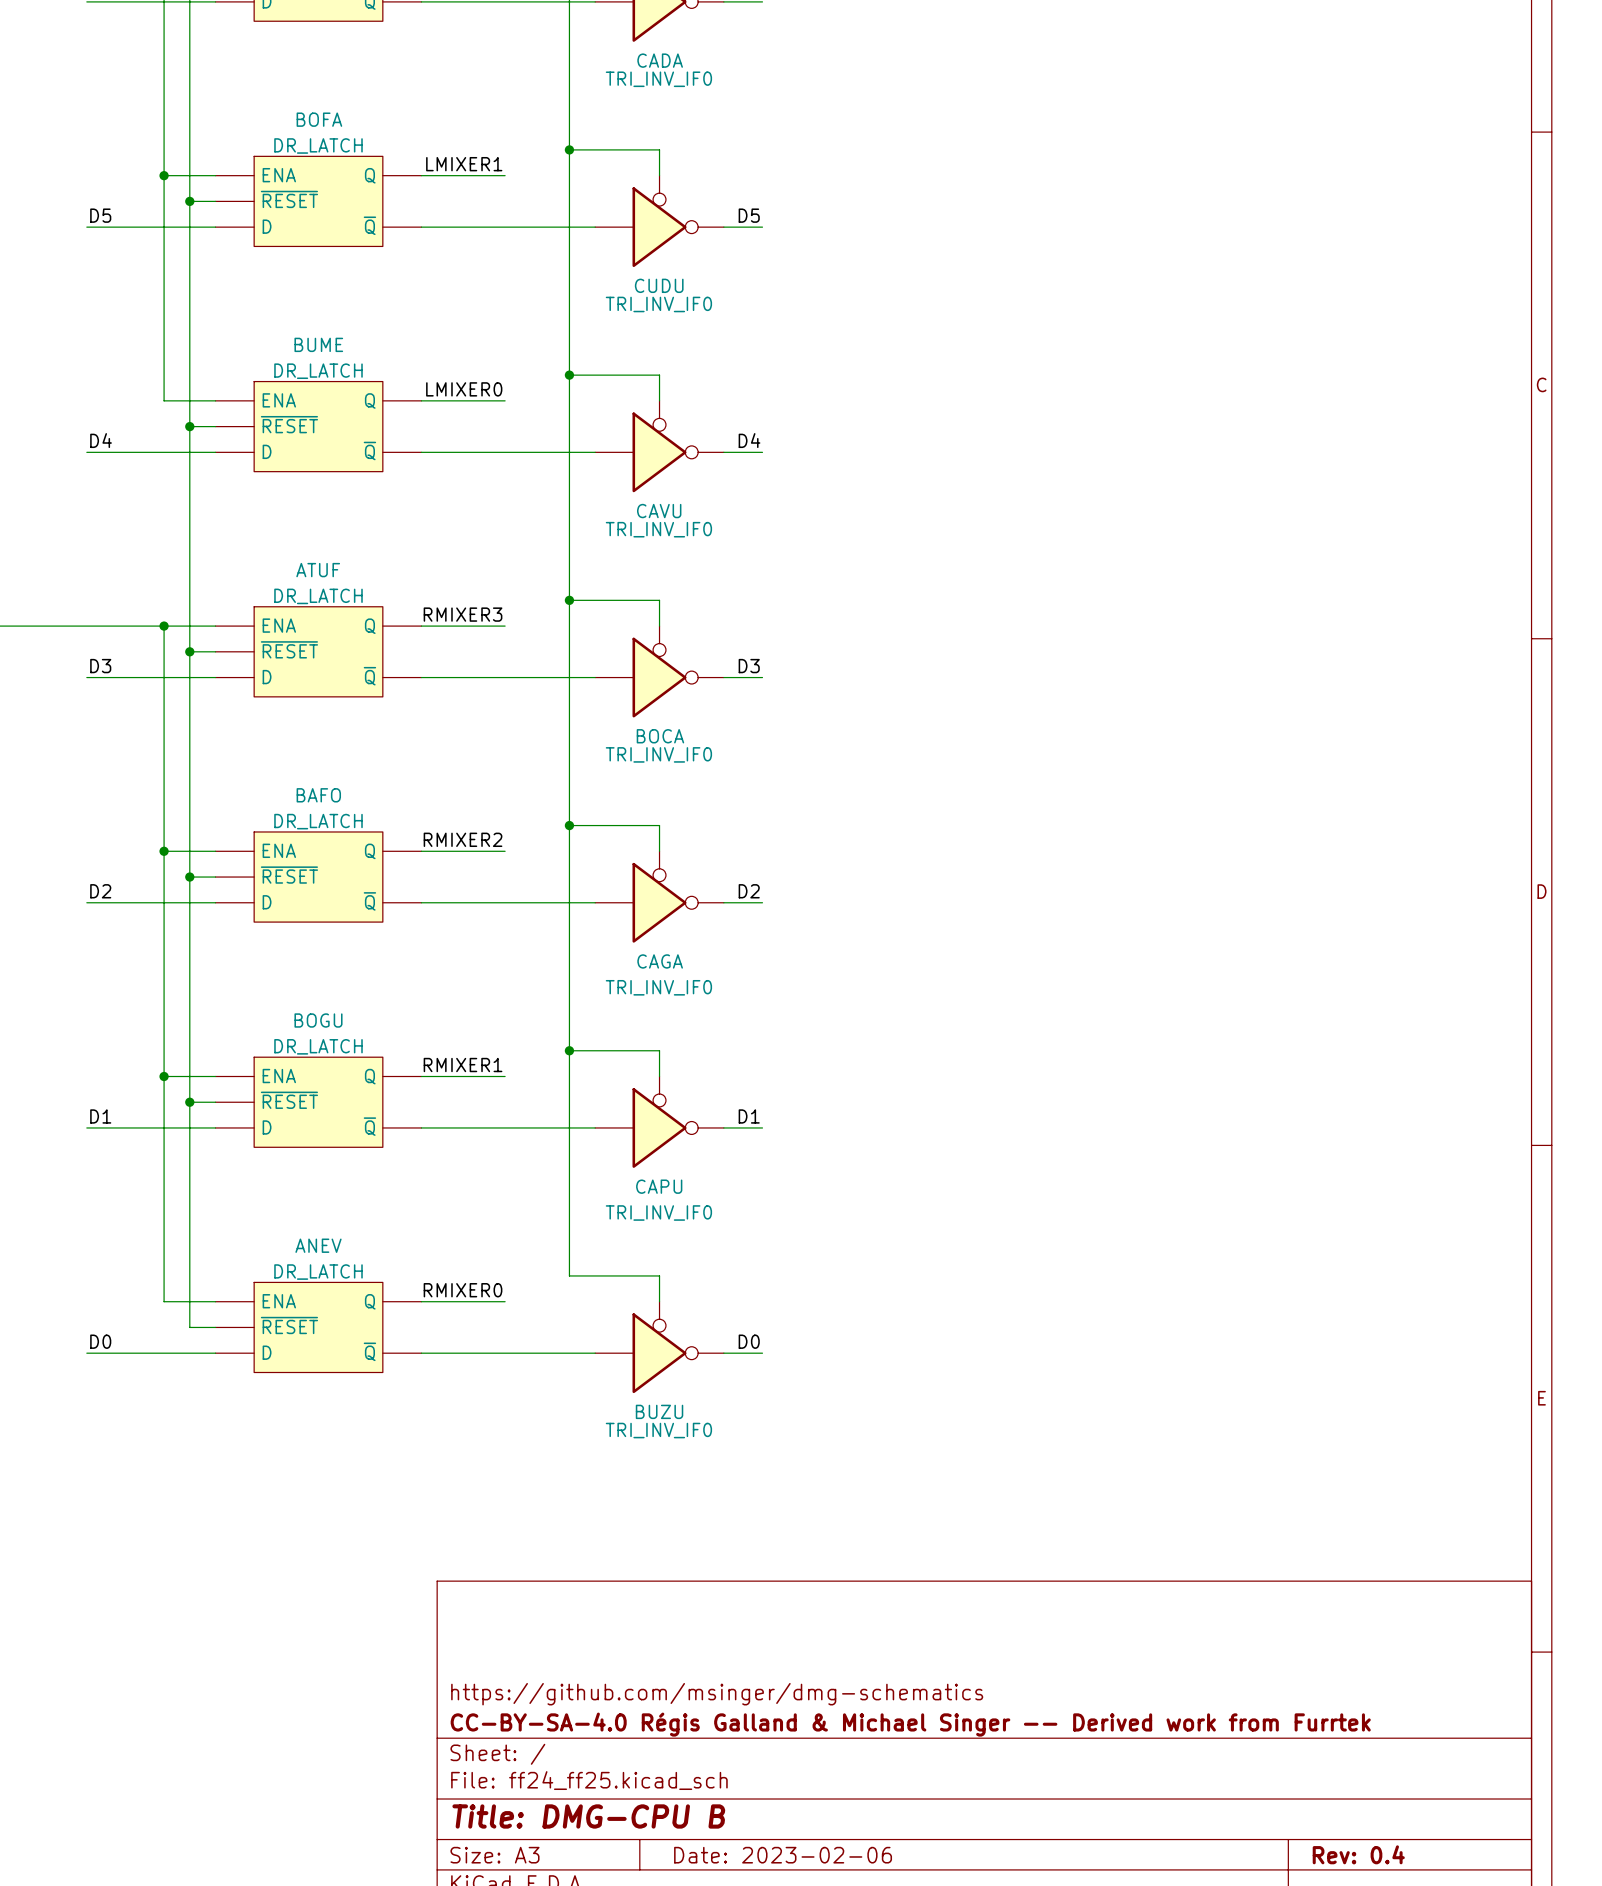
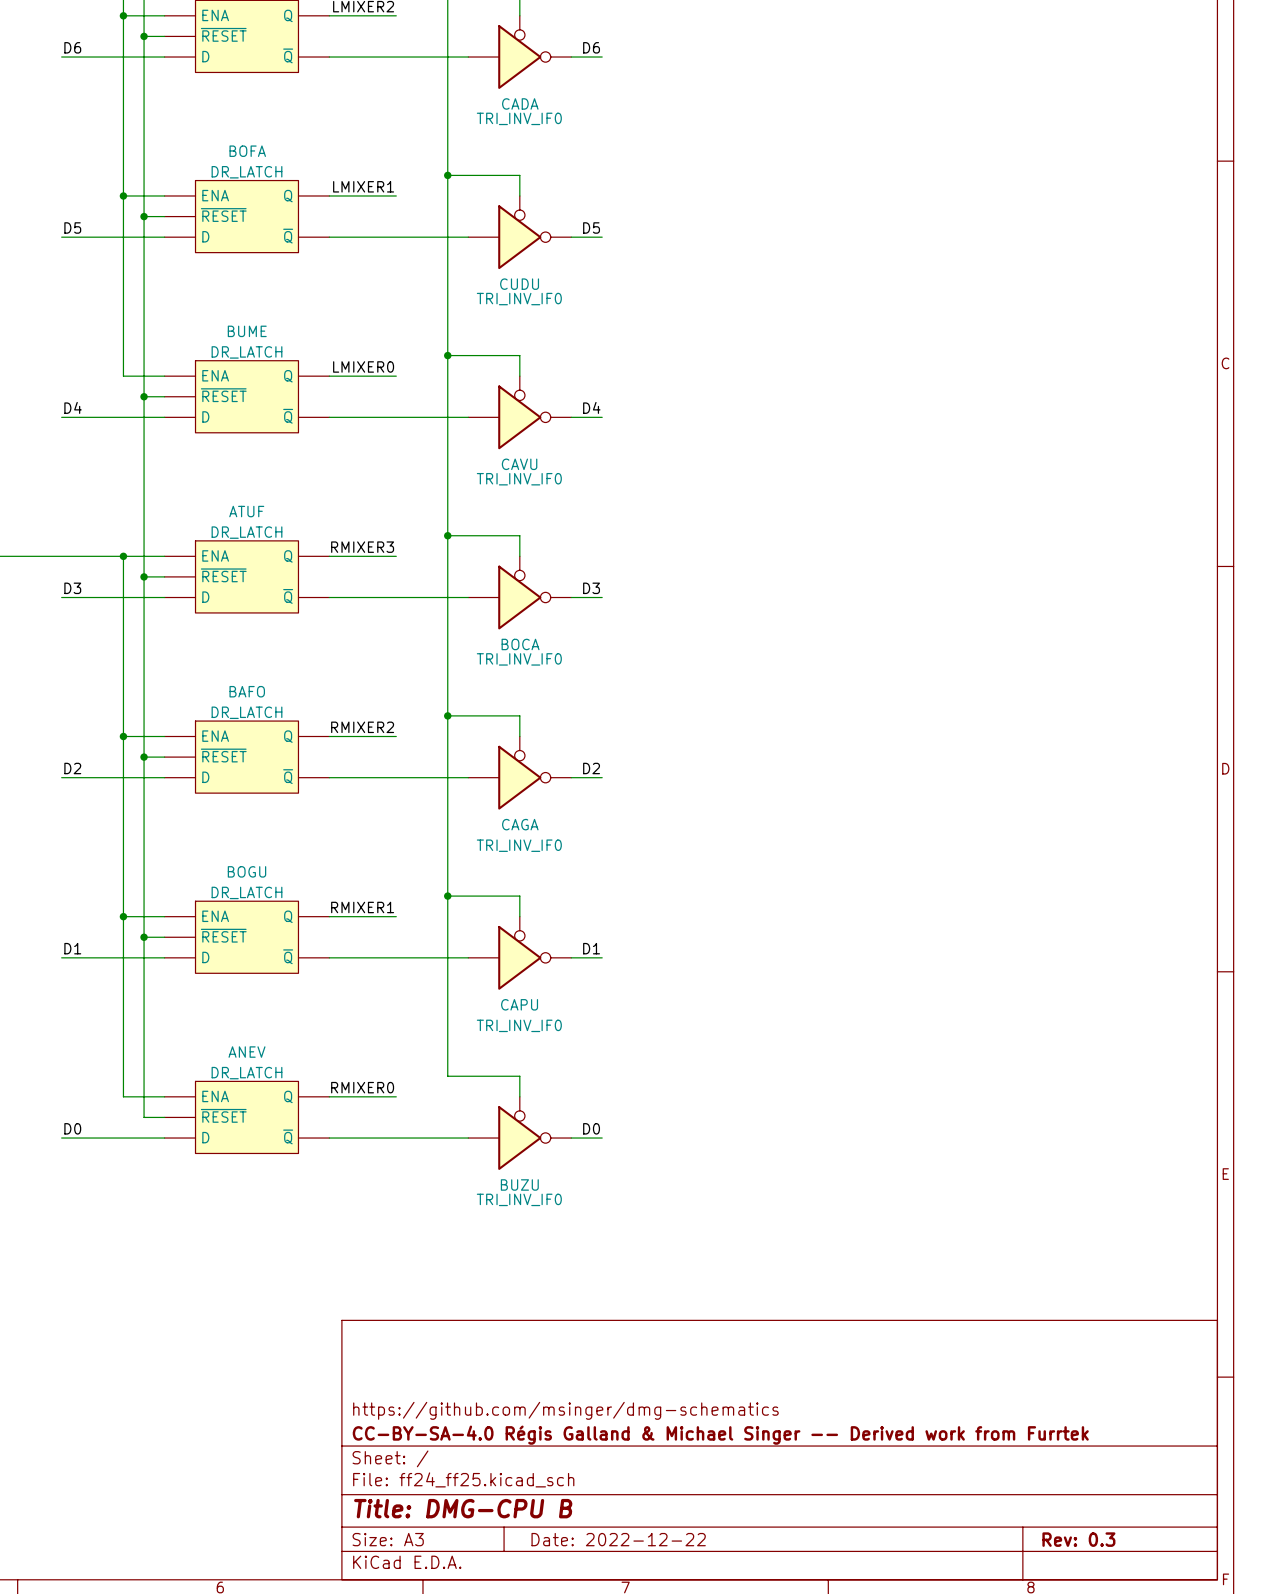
title block: Rev: 0.4 (1358, 1854) -> Rev: 0.3 (1078, 1539)
title block: Date: 2023-02-06 (783, 1855) -> Date: 2022-12-22 (618, 1539)

